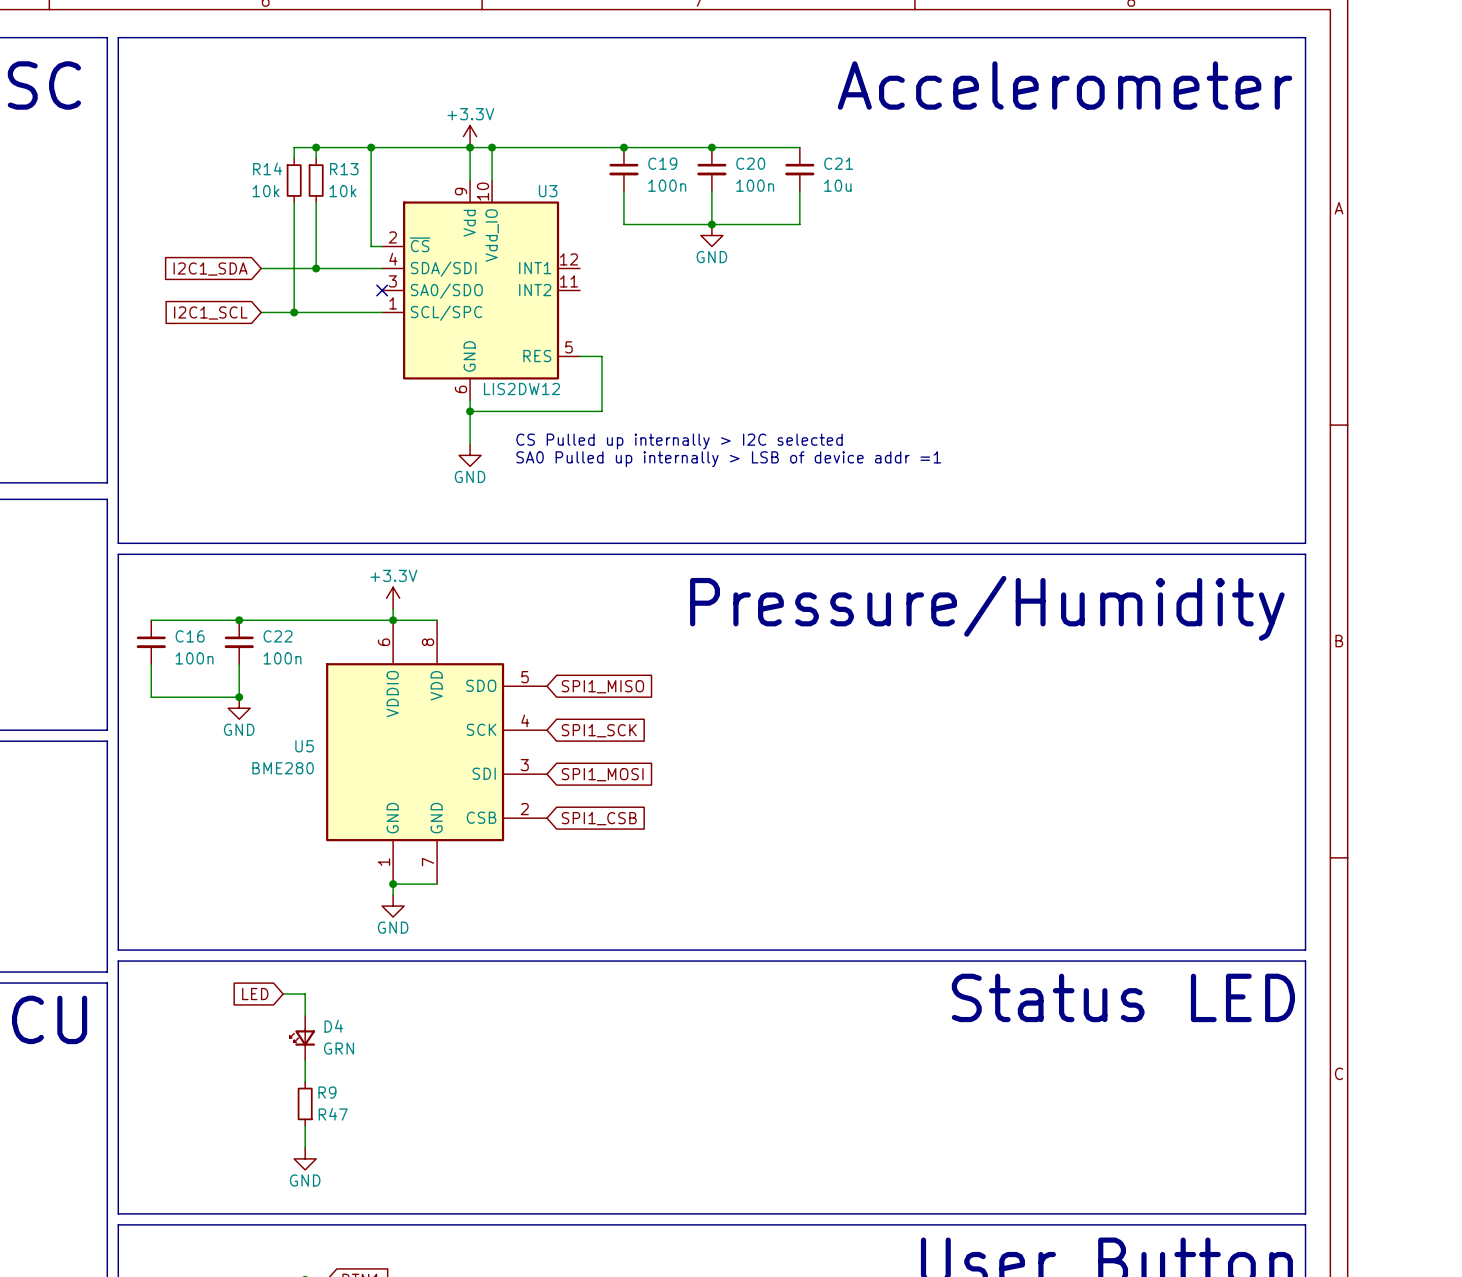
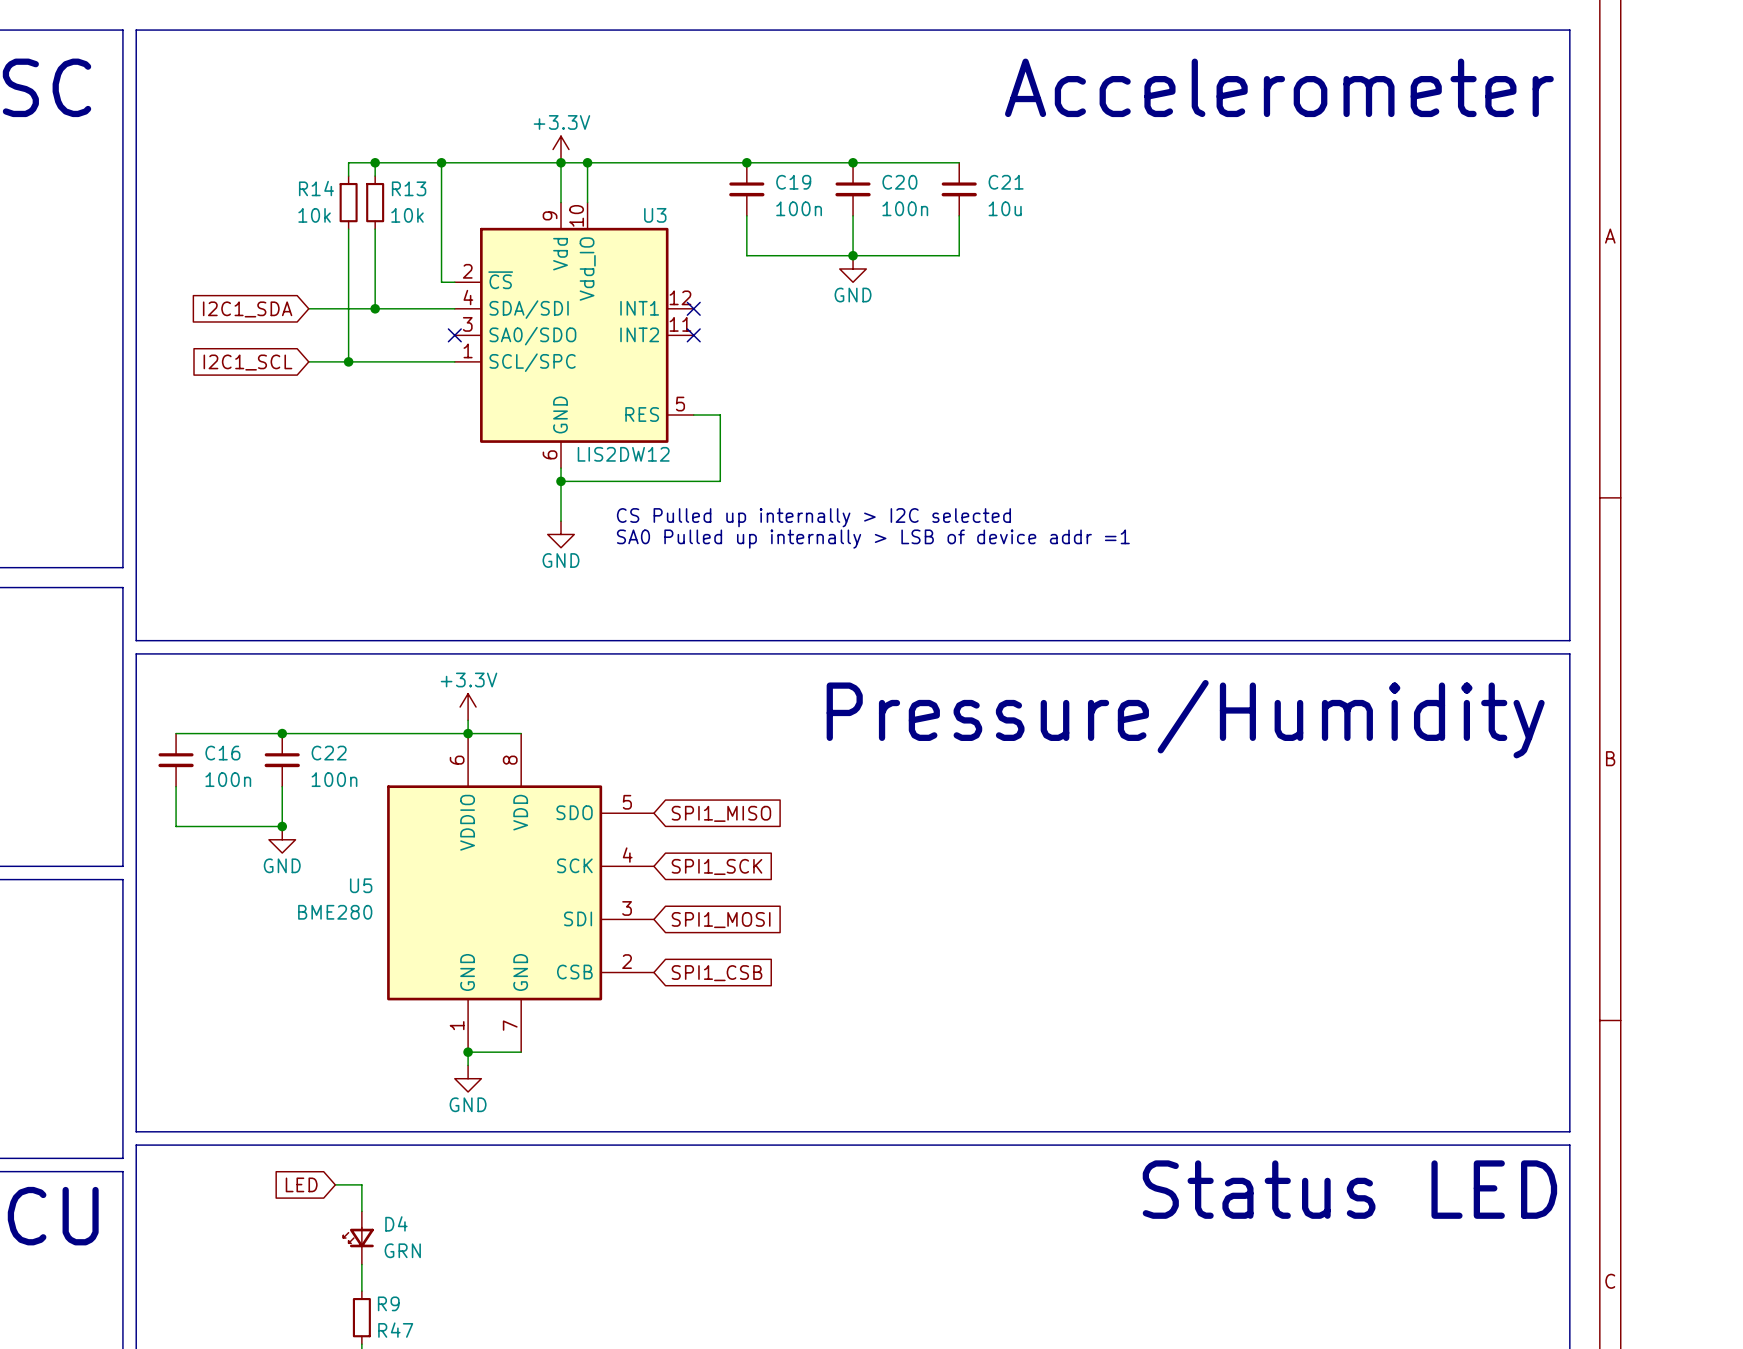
no-connect mark: none -> (693, 308)
no-connect mark: none -> (693, 335)

